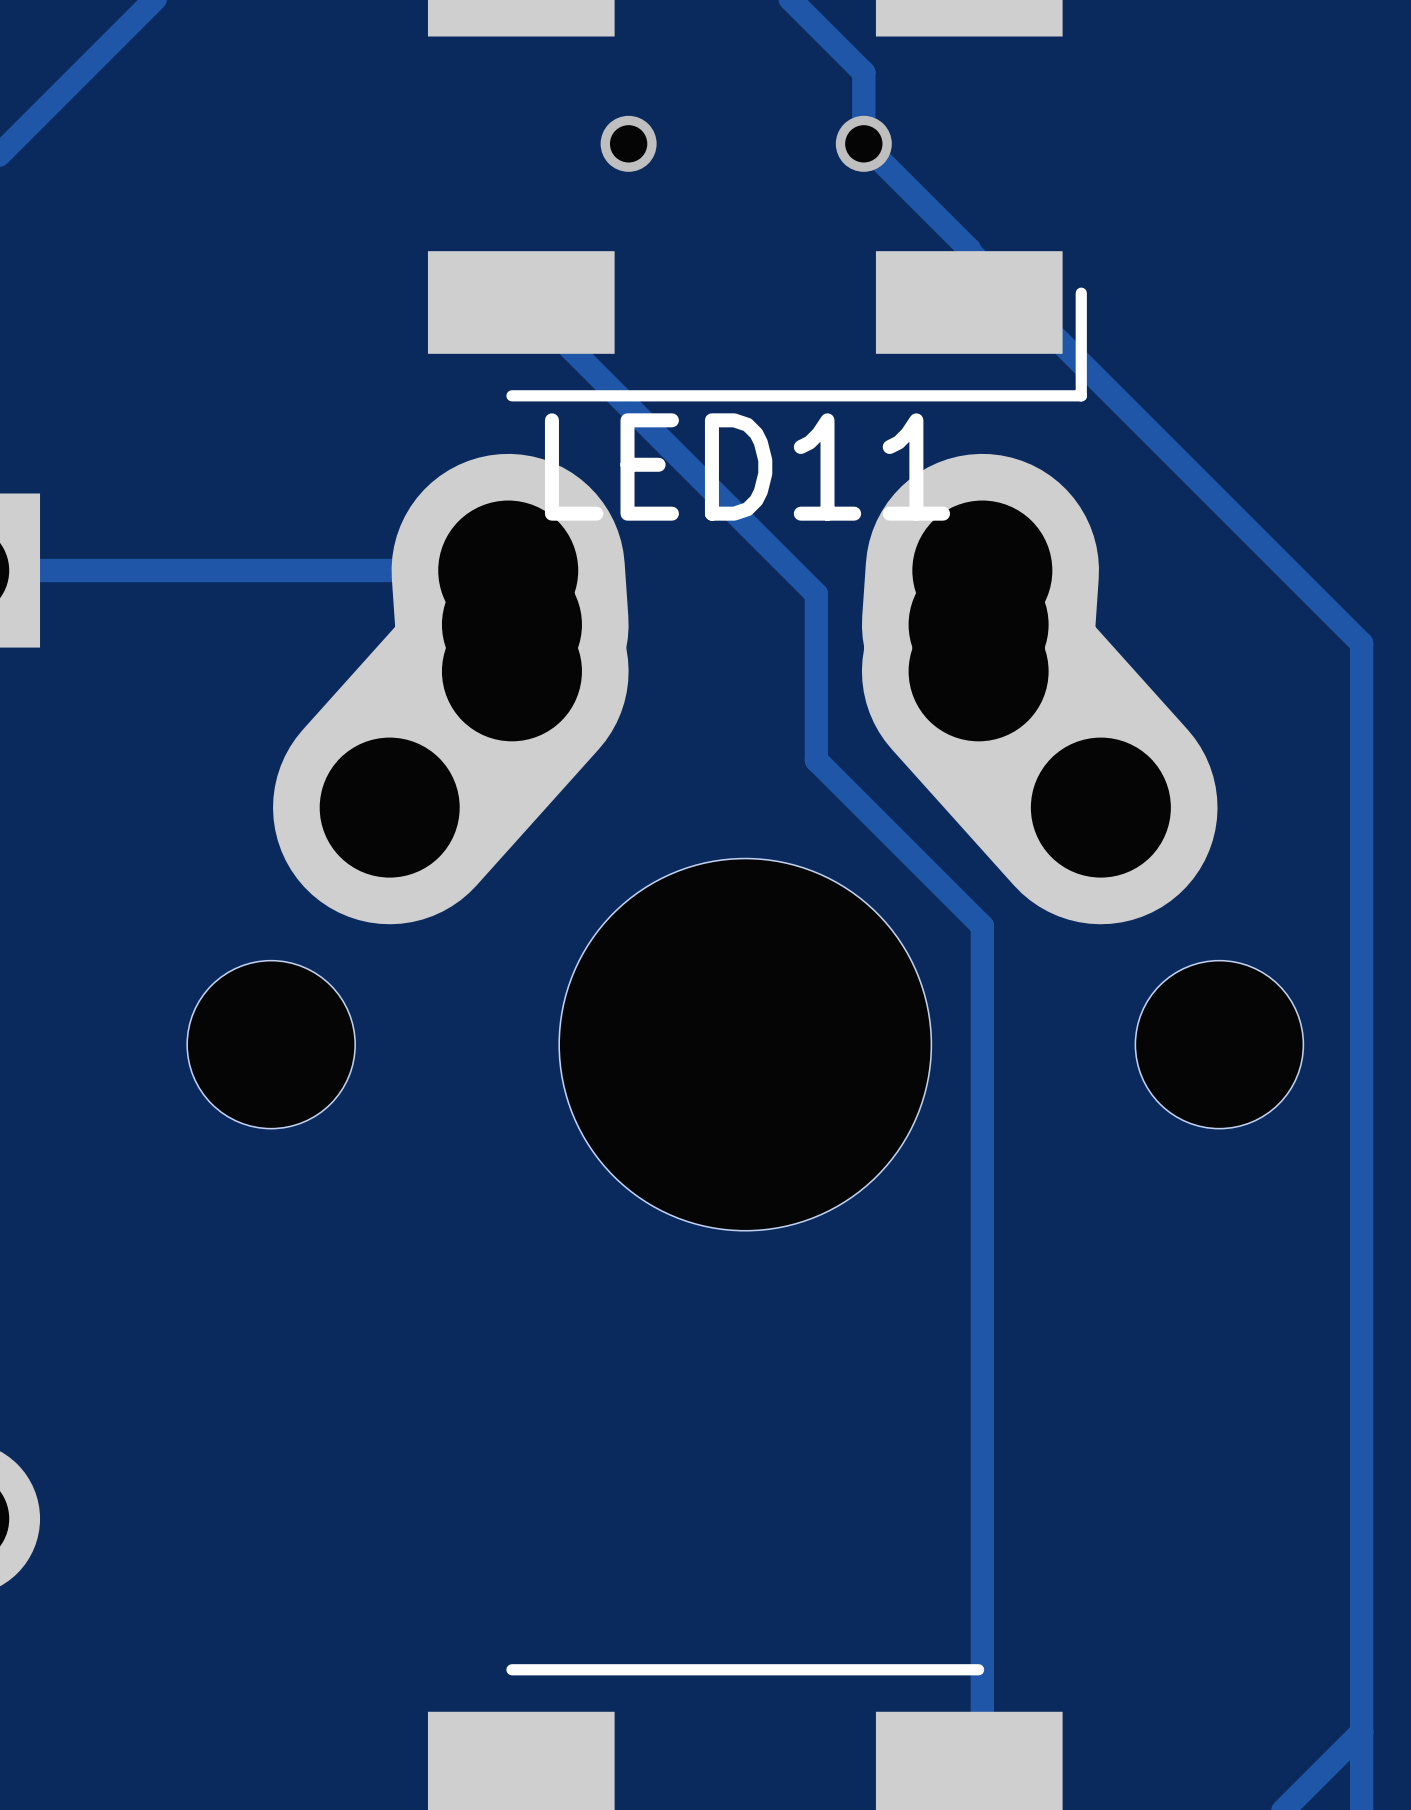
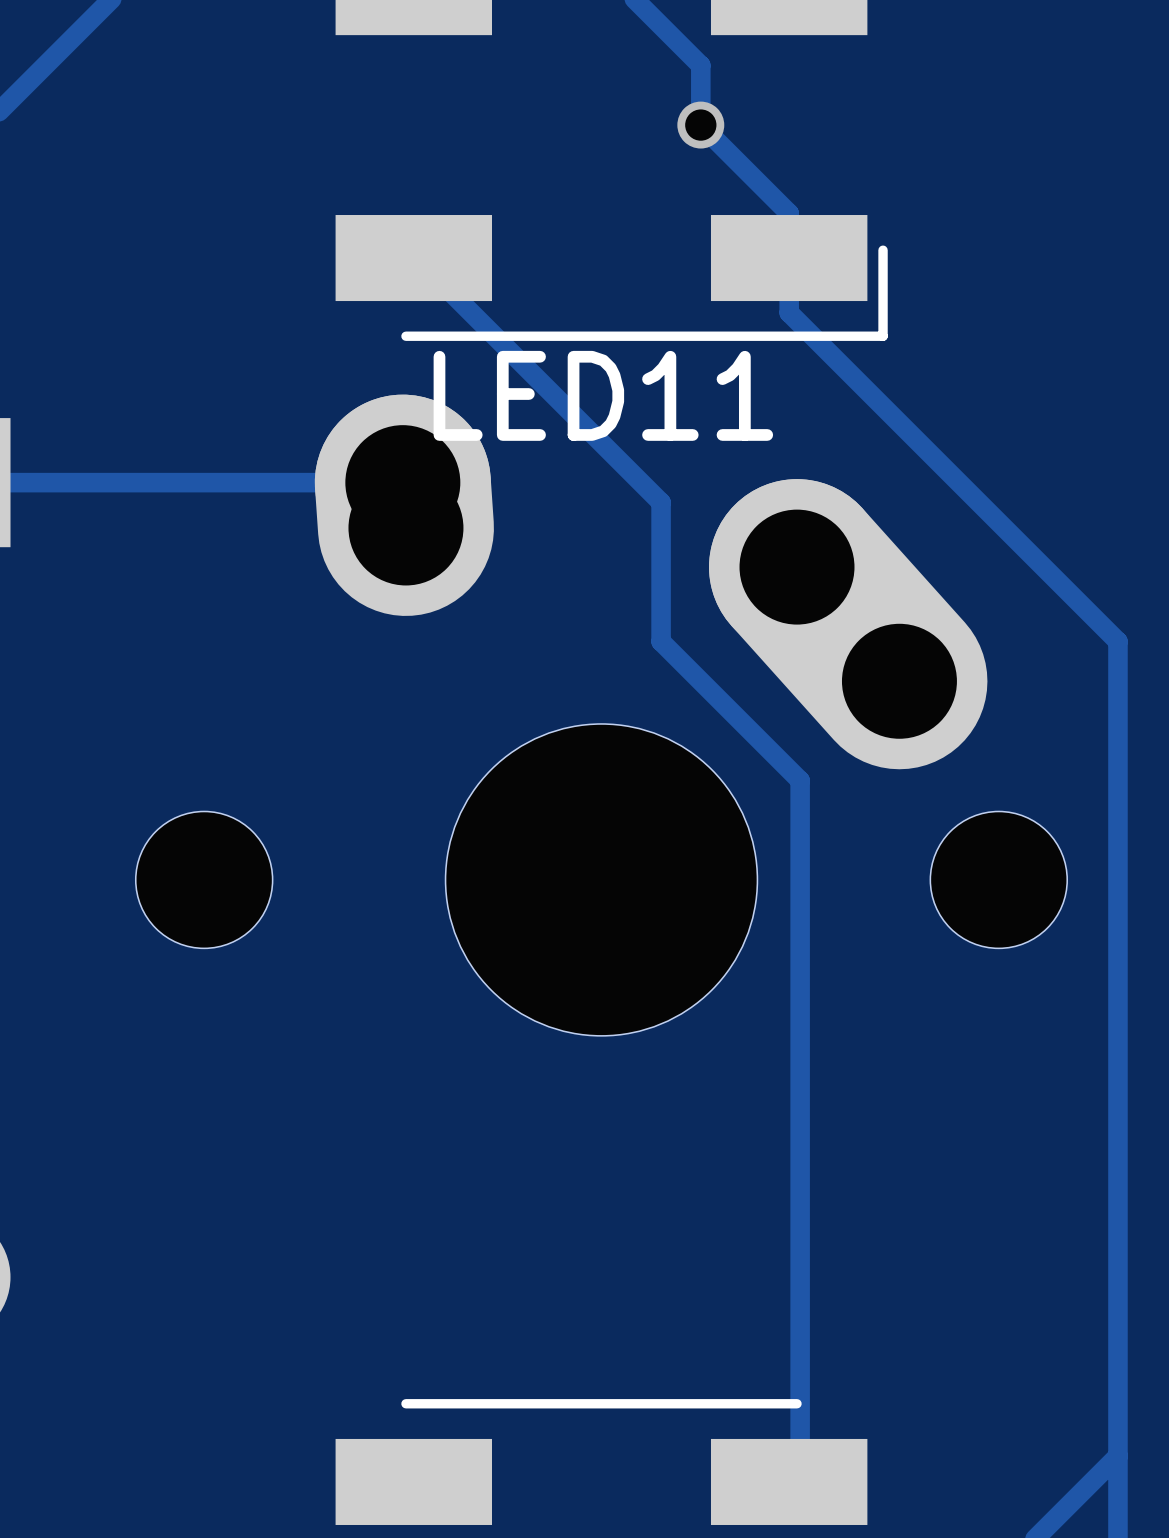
via: (628, 143) -> none
track: (969, 251) (1361, 643) (1361, 760) -> (789, 258) (789, 312) (1117, 641)
part footprint: [187, 453, 1304, 1231] -> [135, 394, 1068, 1036]

